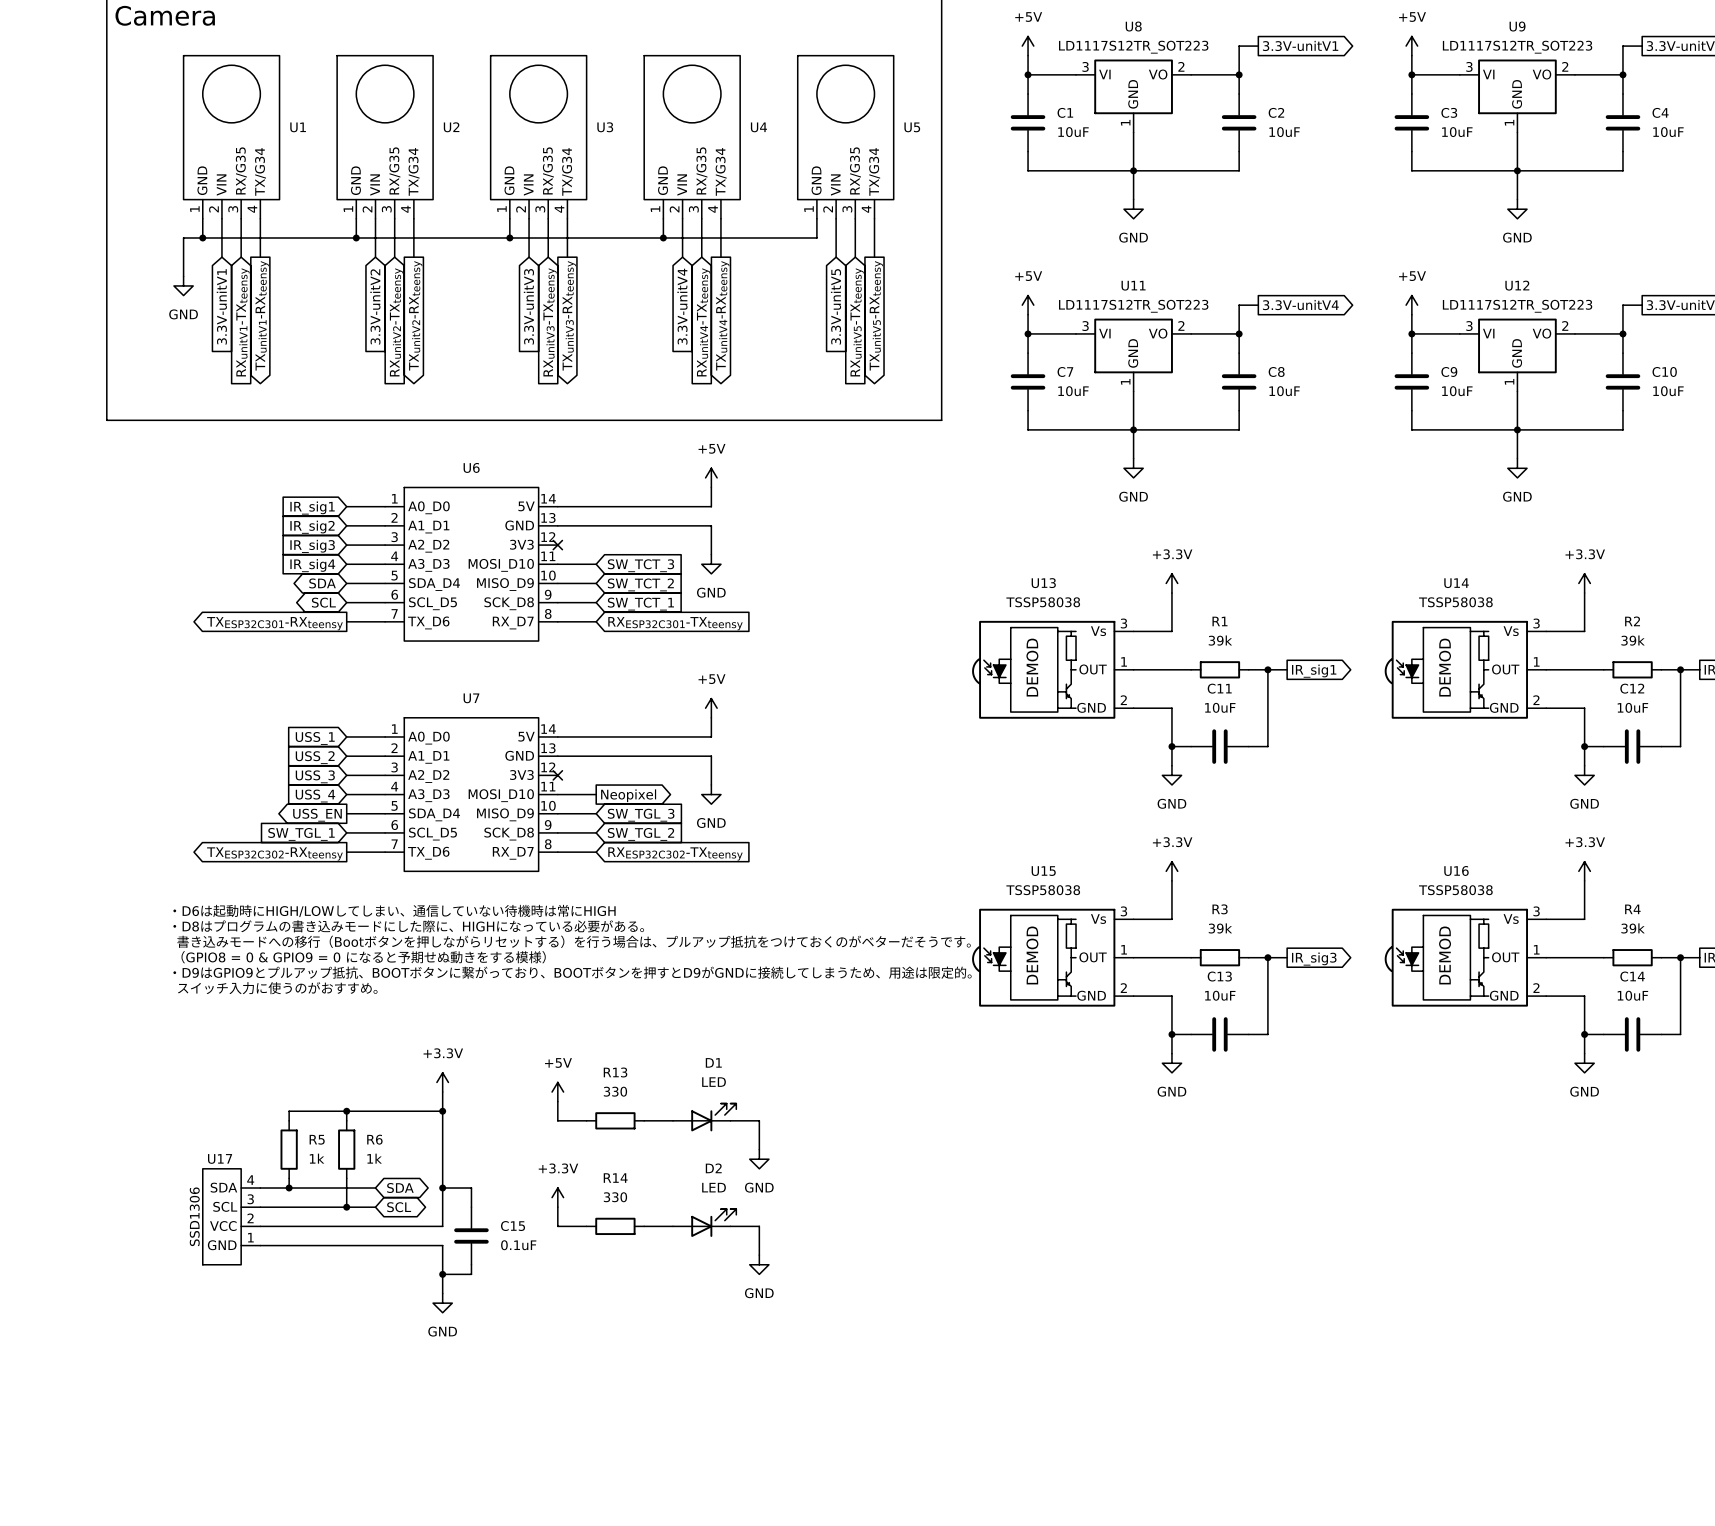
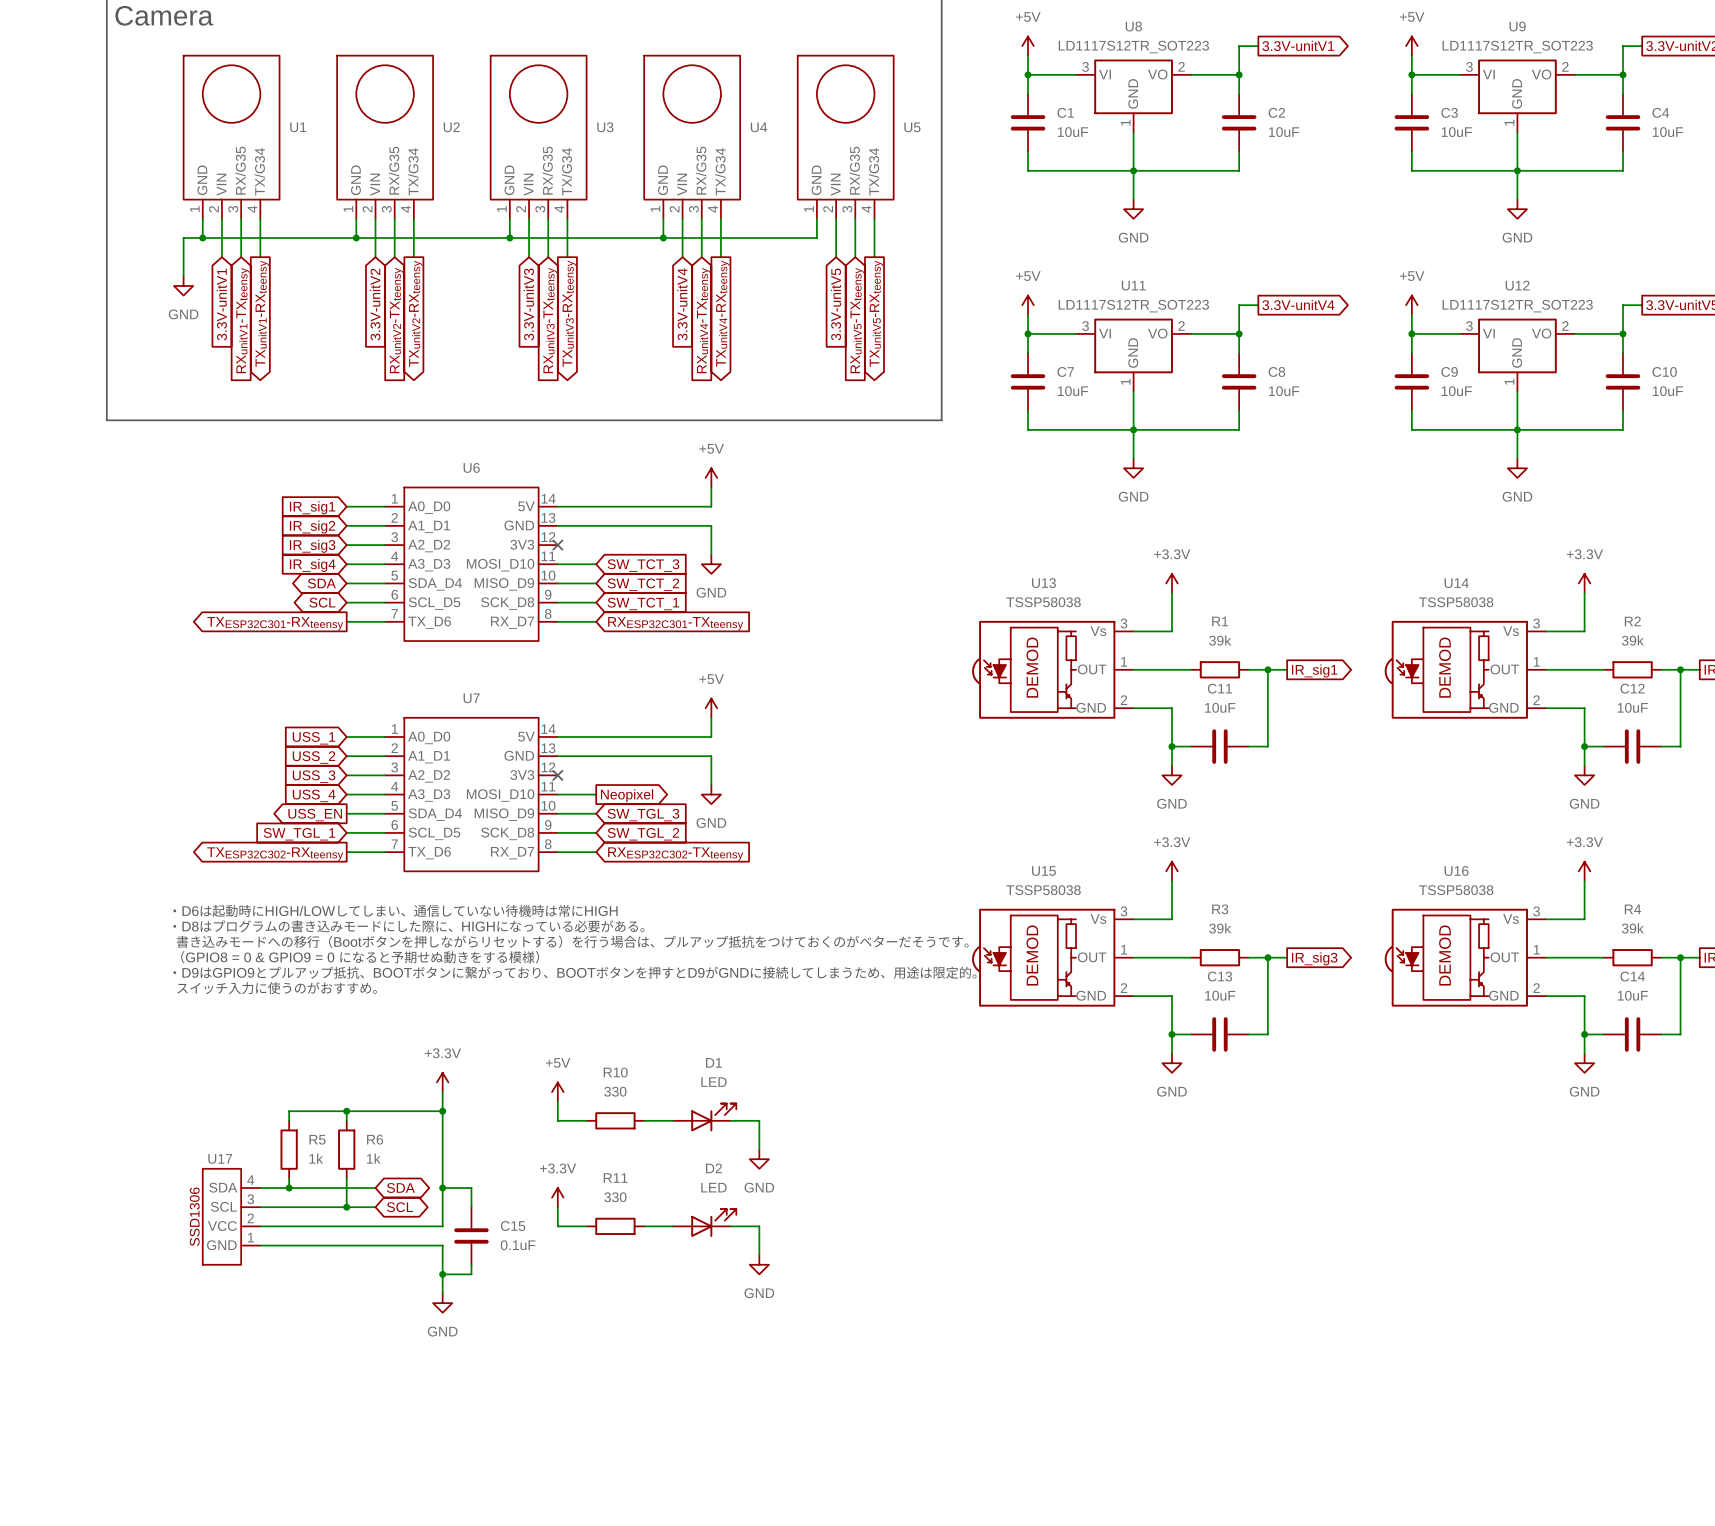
R13 name: R13 (615, 1072) -> R10 (615, 1072)
R14 name: R14 (615, 1178) -> R11 (615, 1178)

